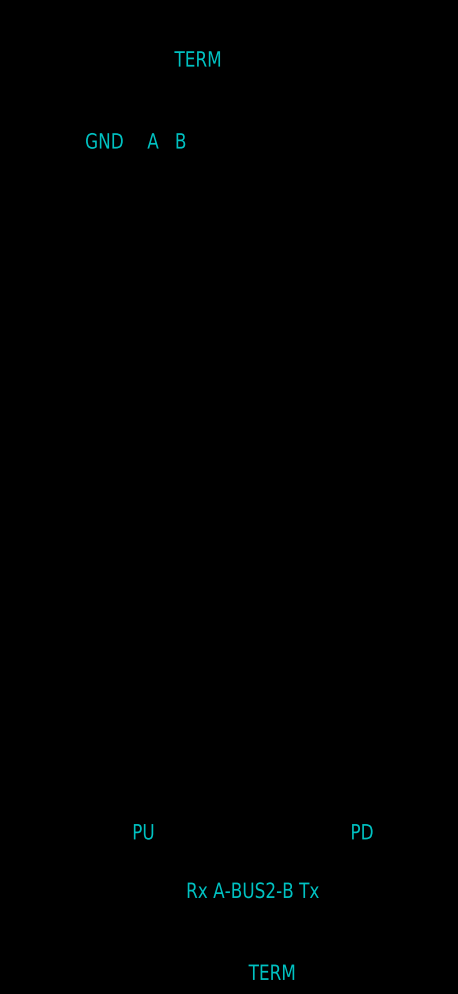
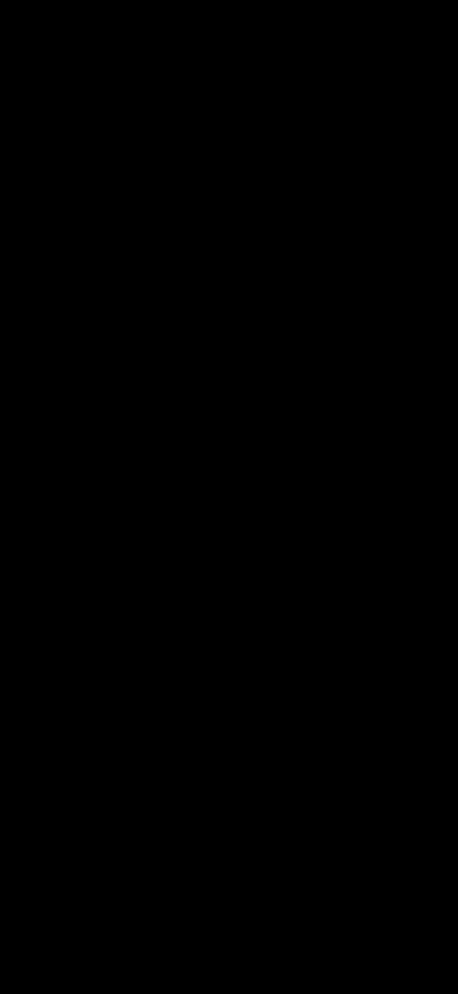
text: TERM (197, 58) -> none
text: GND (104, 140) -> none
text: A B (166, 140) -> none
text: PU (143, 831) -> none
text: PD (362, 831) -> none
text: Rx A-BUS2-B Tx (253, 890) -> none
text: TERM (271, 972) -> none

